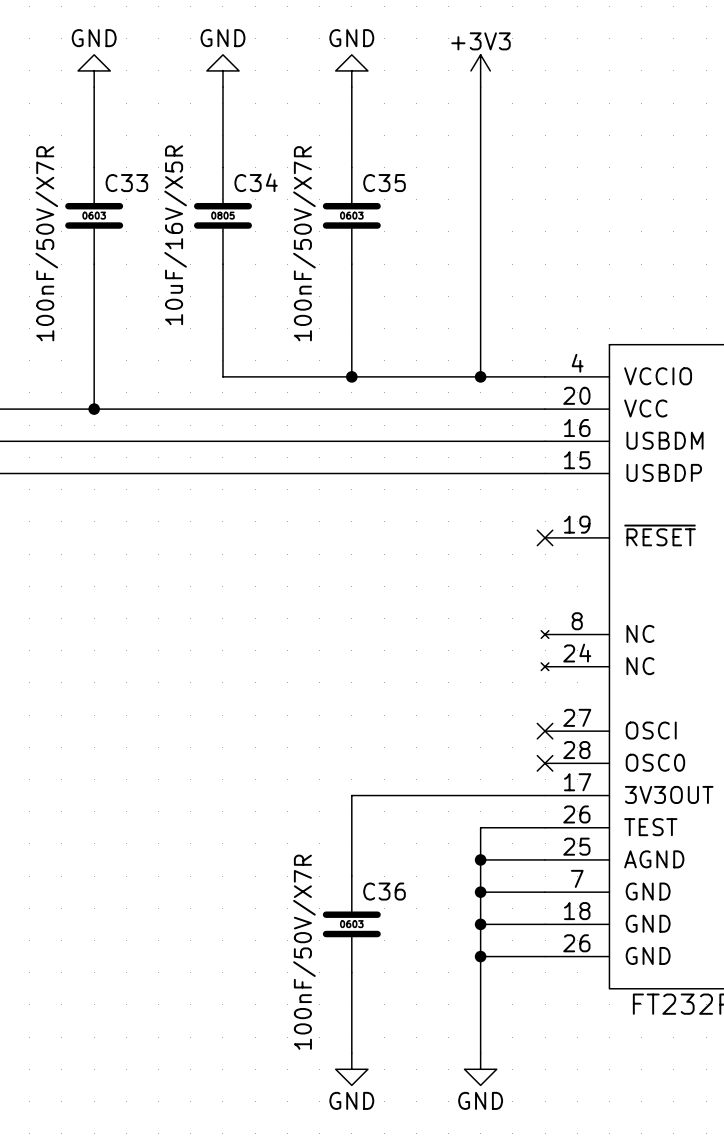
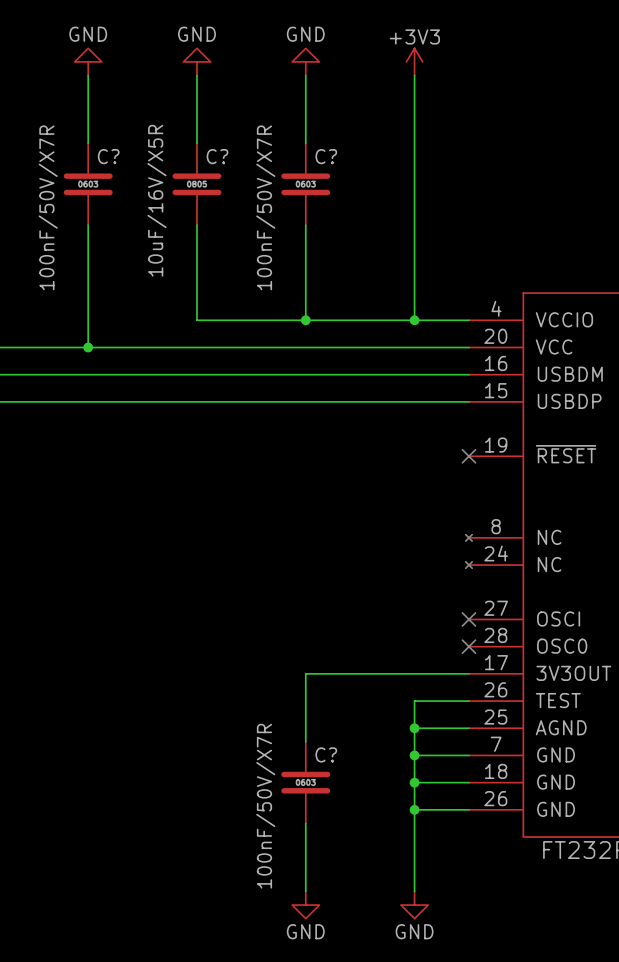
C34 name: C34 (256, 182) -> C? (217, 156)
C33 name: C33 (126, 183) -> C? (108, 156)
C35 name: C35 (384, 183) -> C? (326, 156)
C36 name: C36 (384, 891) -> C? (326, 754)

